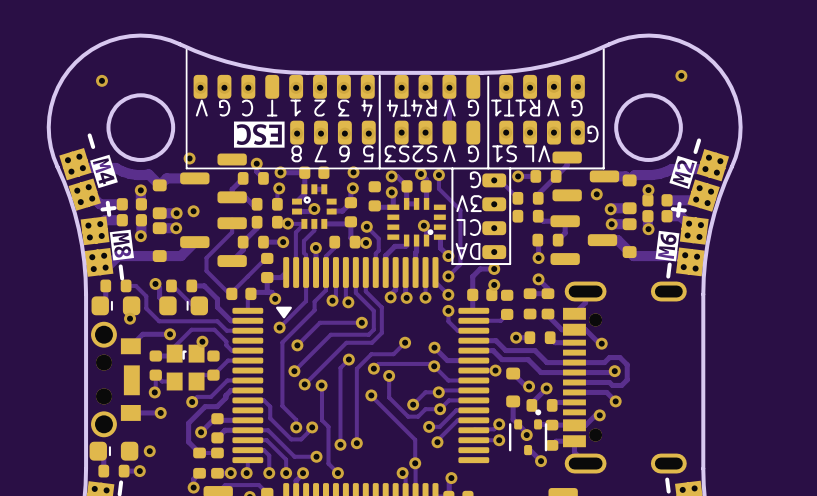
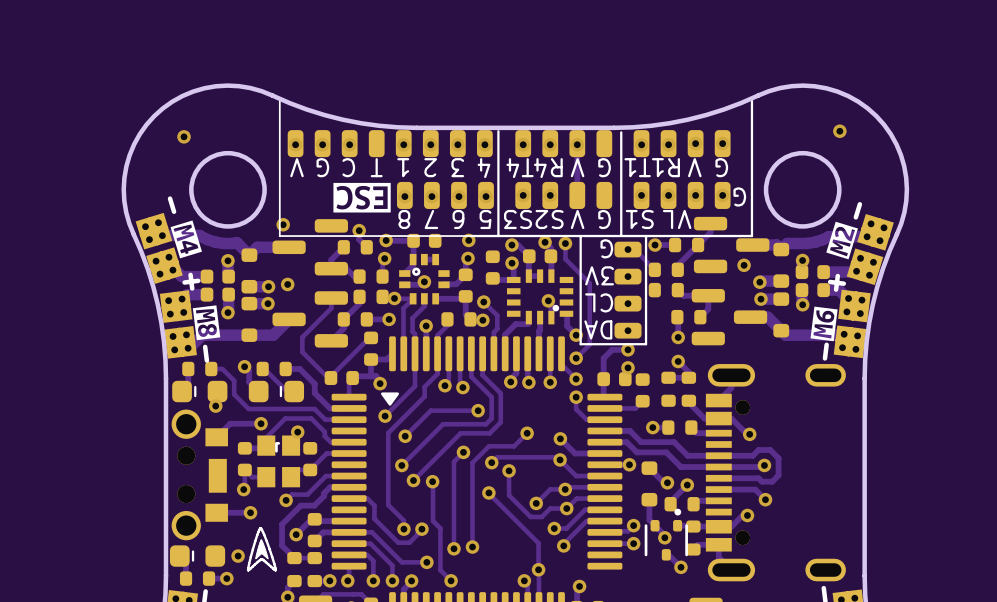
line: none -> (260, 528) (248, 569)
line: none -> (260, 528) (275, 569)
drawing: none -> [255, 539, 269, 560]
line: none -> (260, 559) (248, 570)
line: none -> (262, 559) (275, 570)

